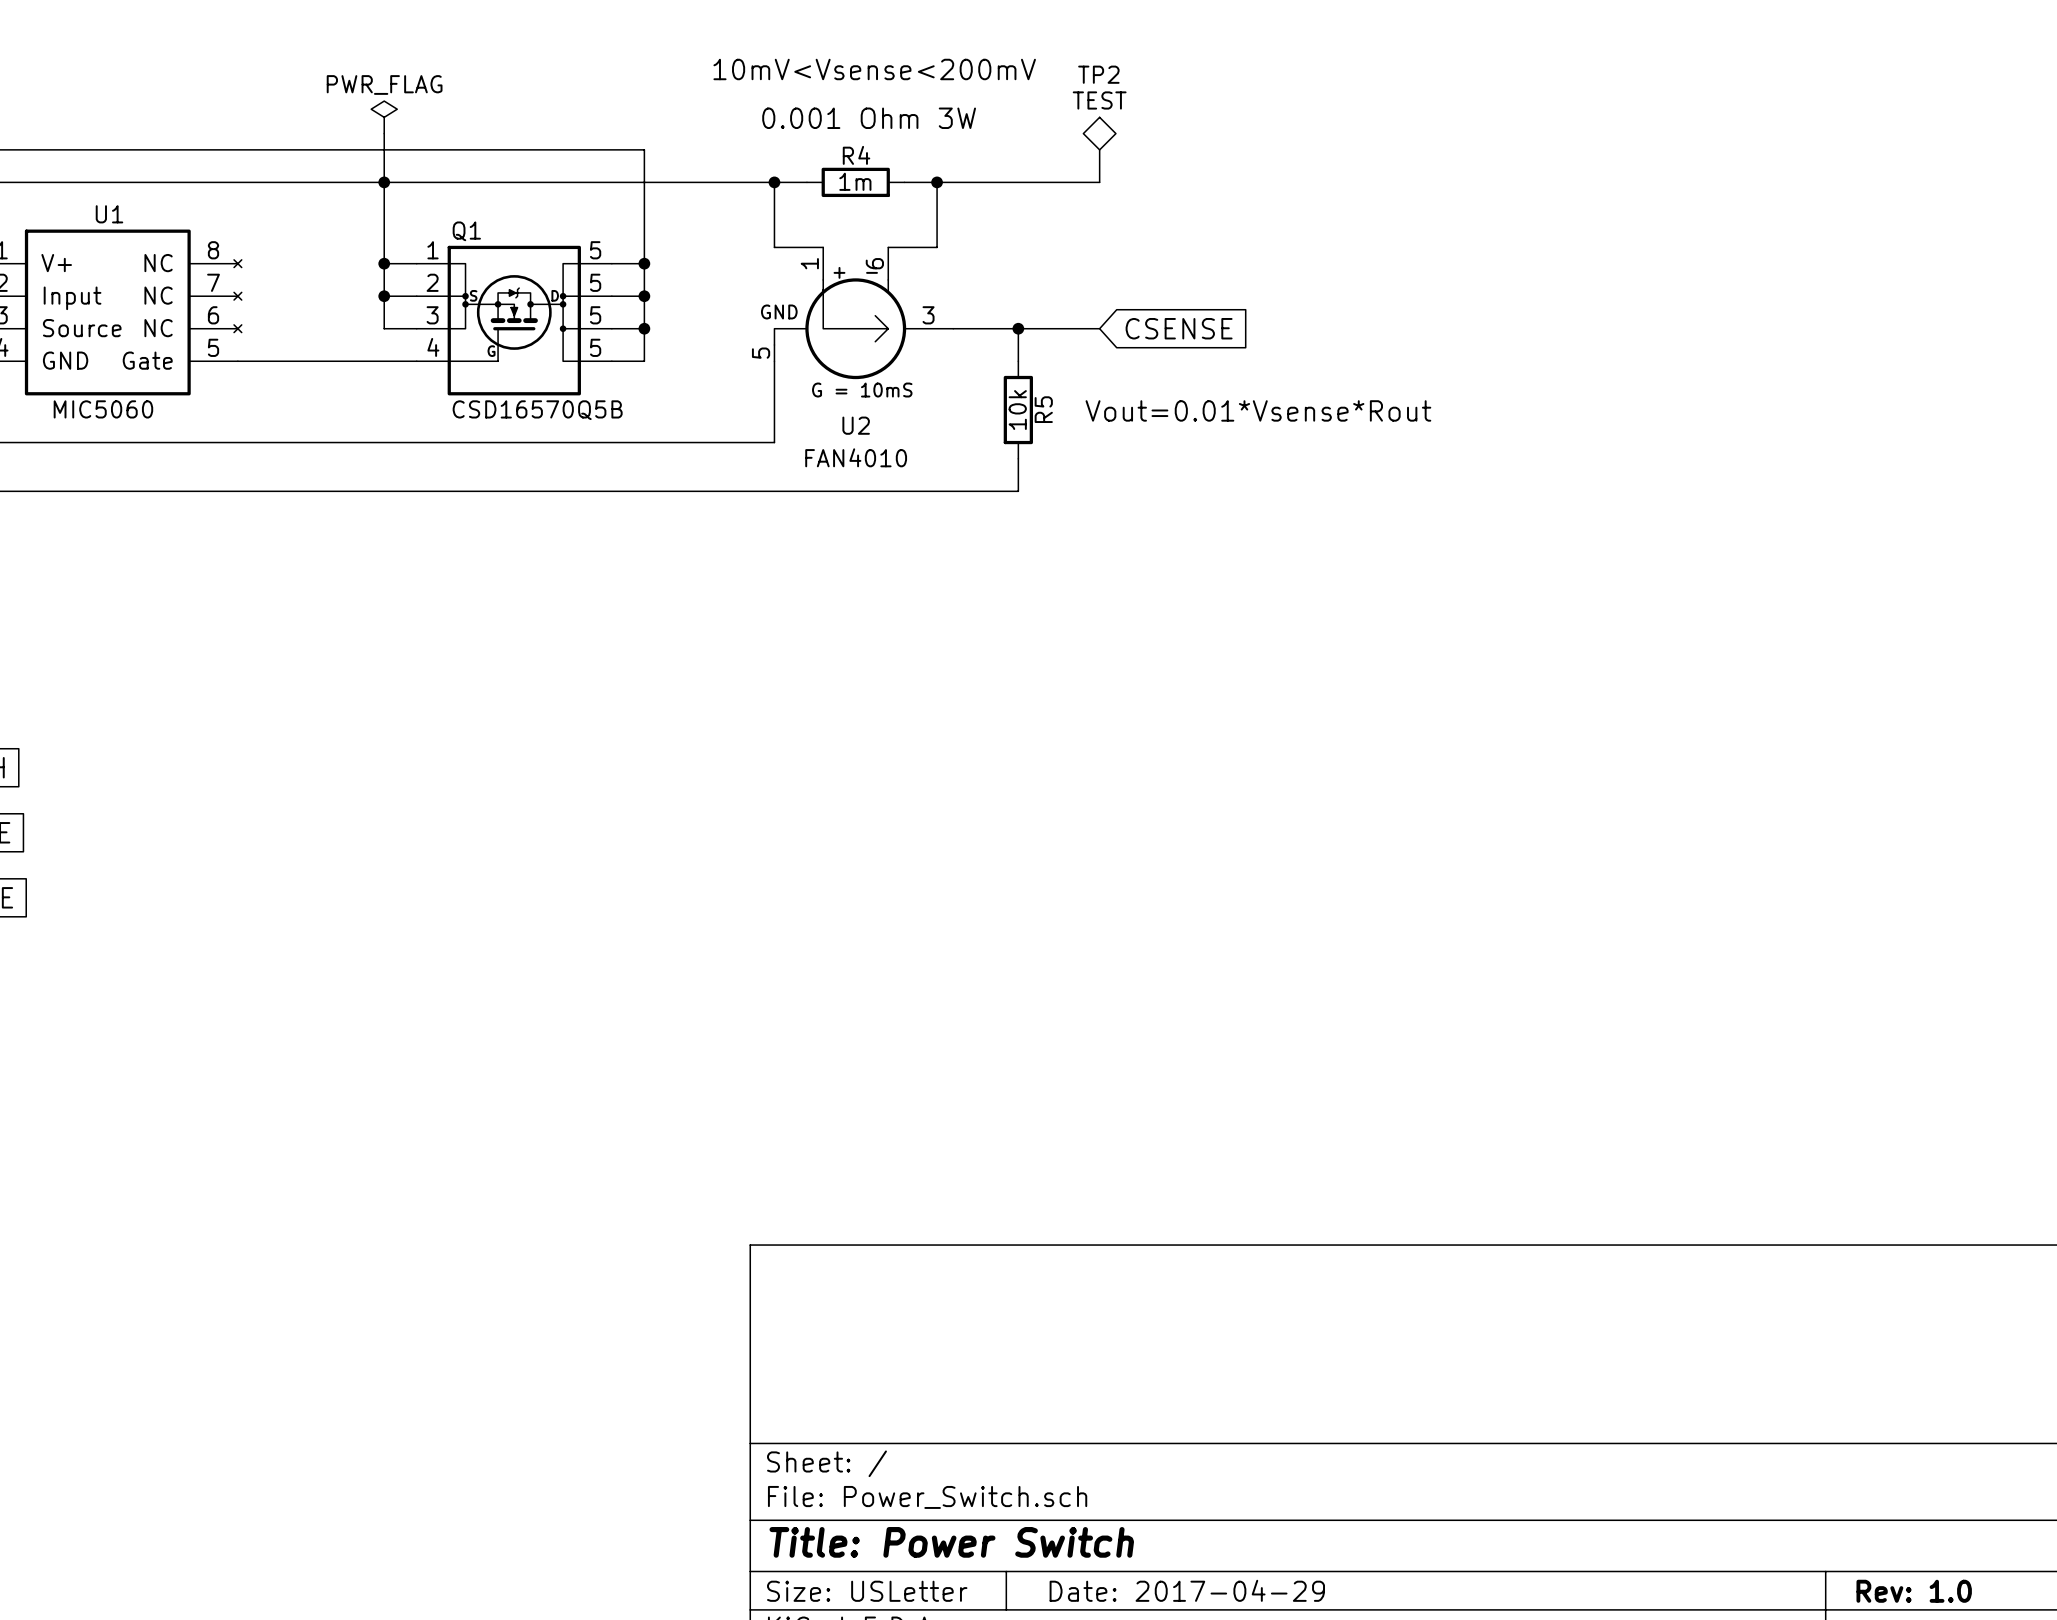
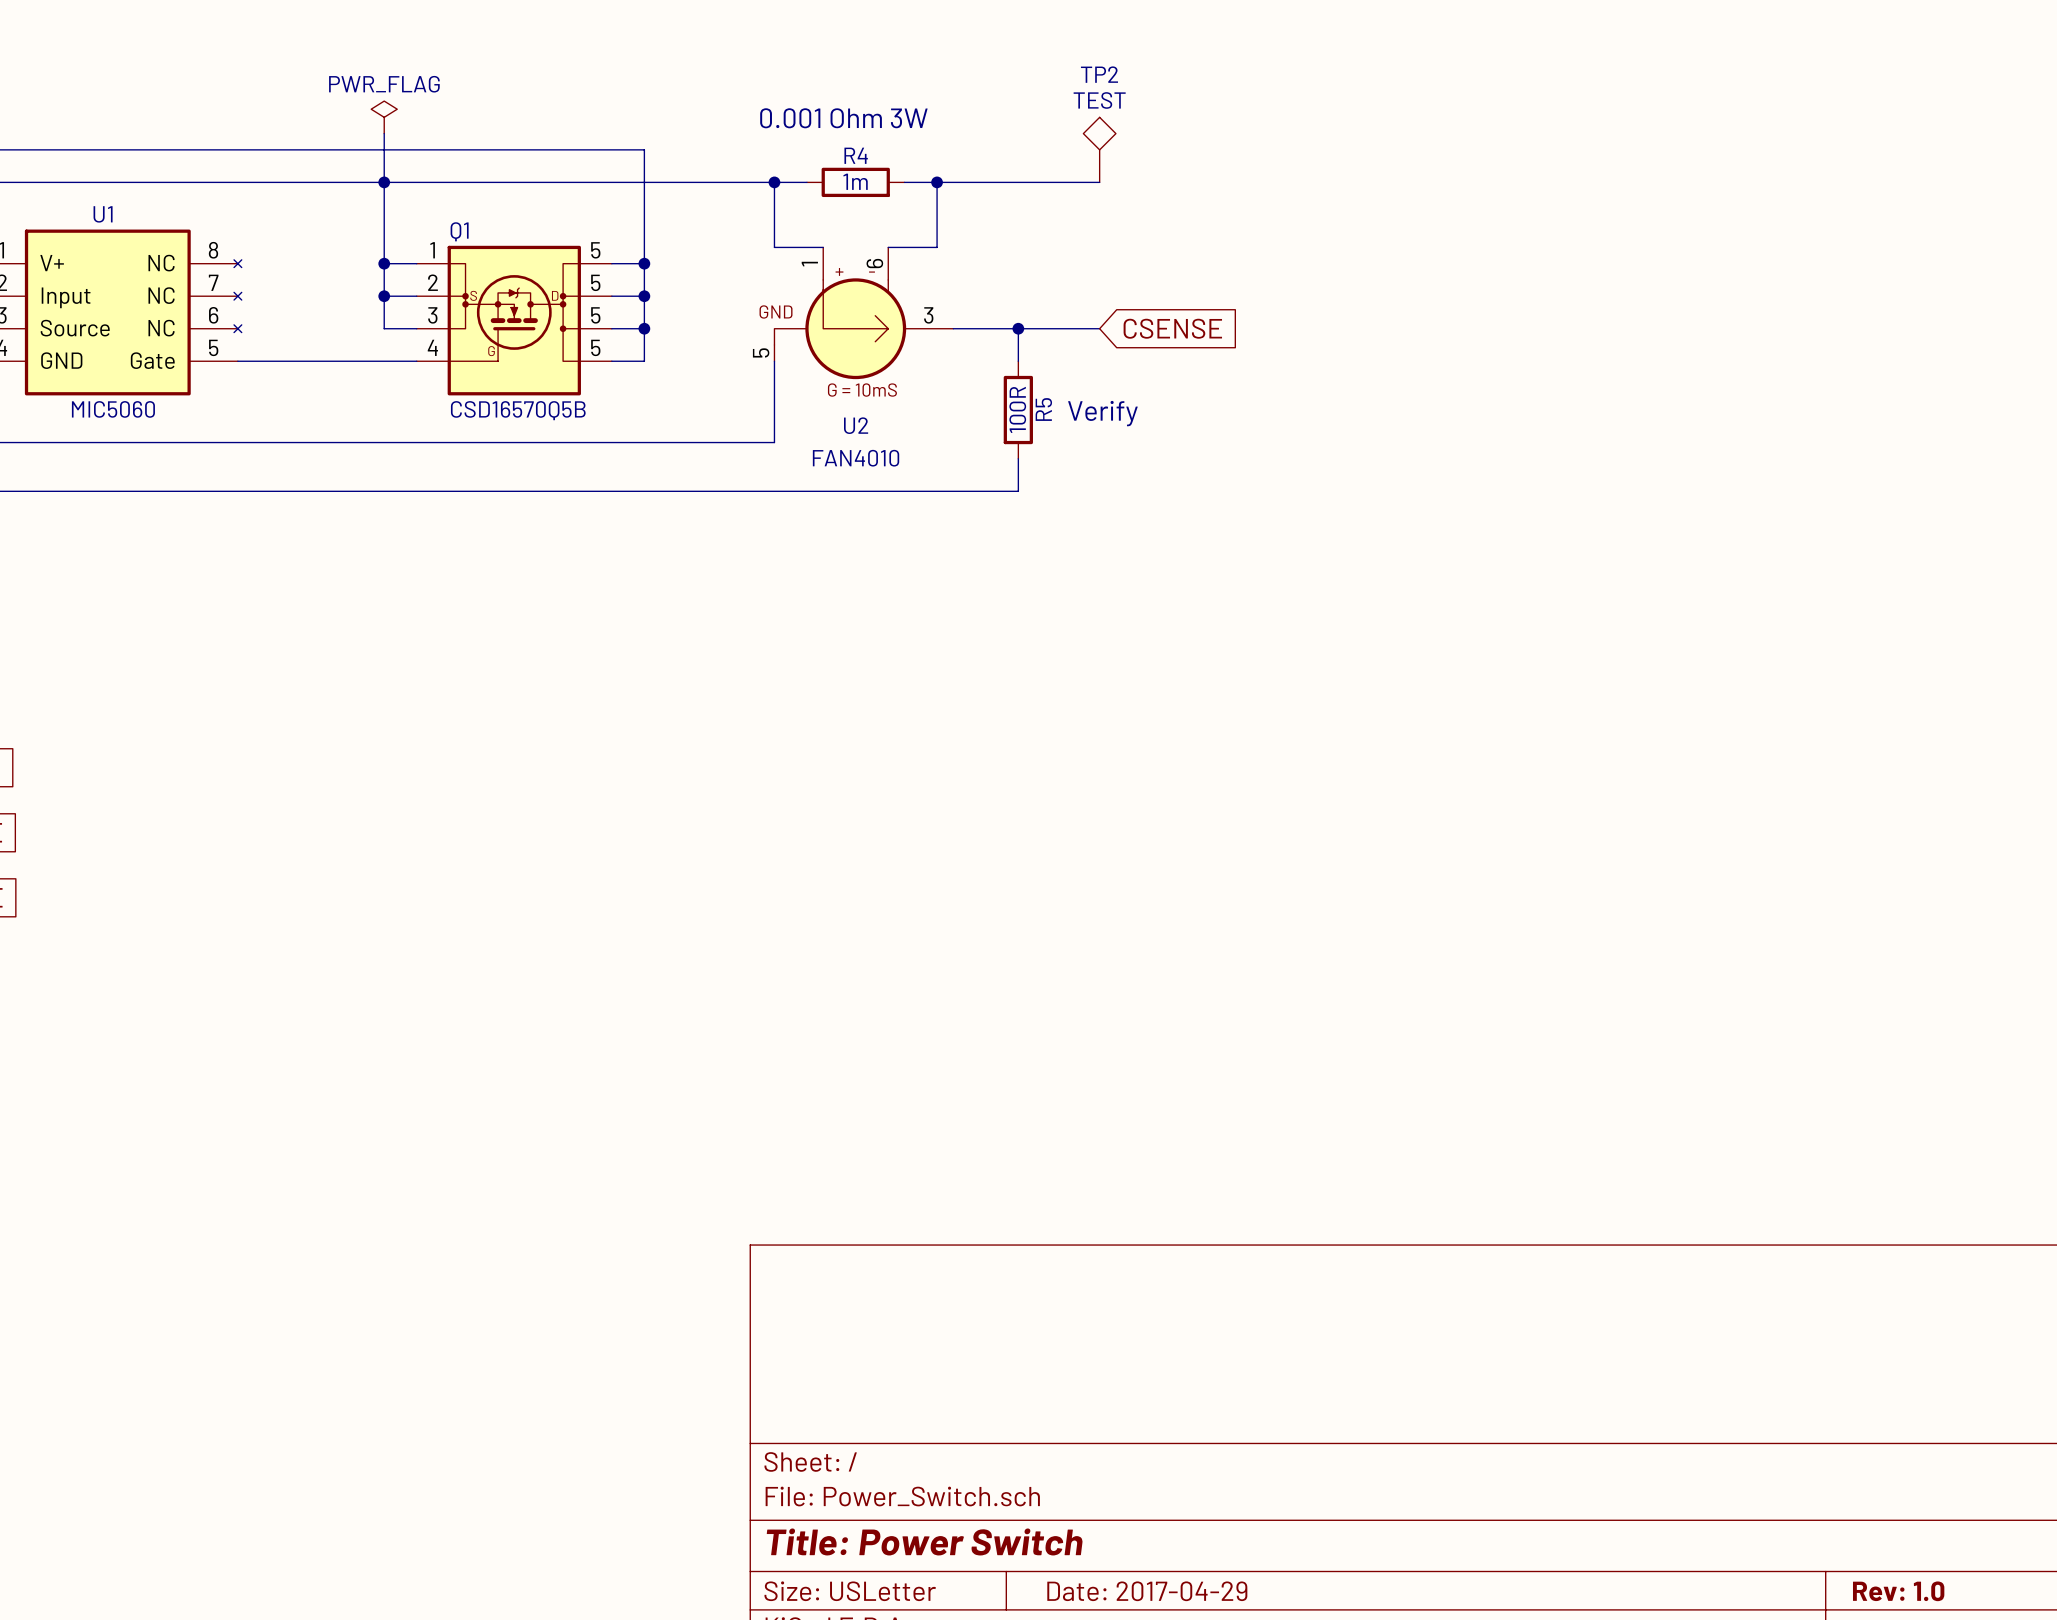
text: 10mV<Vsense<200mV (874, 69) -> none
R5 value: 10k (1017, 410) -> 100R (1017, 409)
text: Vout=0.01*Vsense*Rout (1258, 410) -> none
text: none -> Verify (1102, 413)

